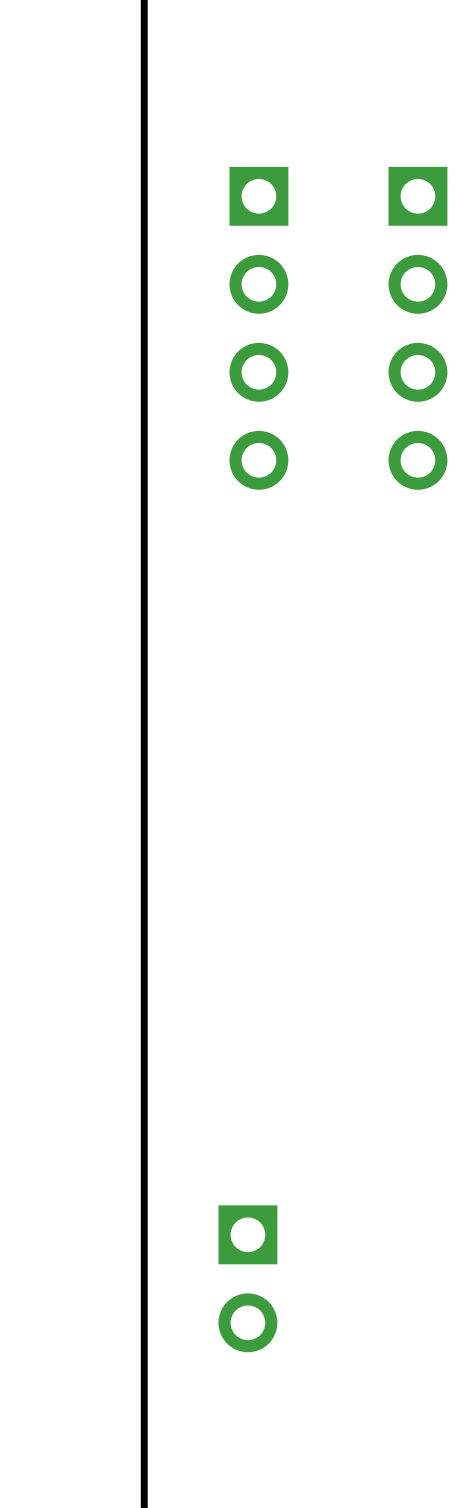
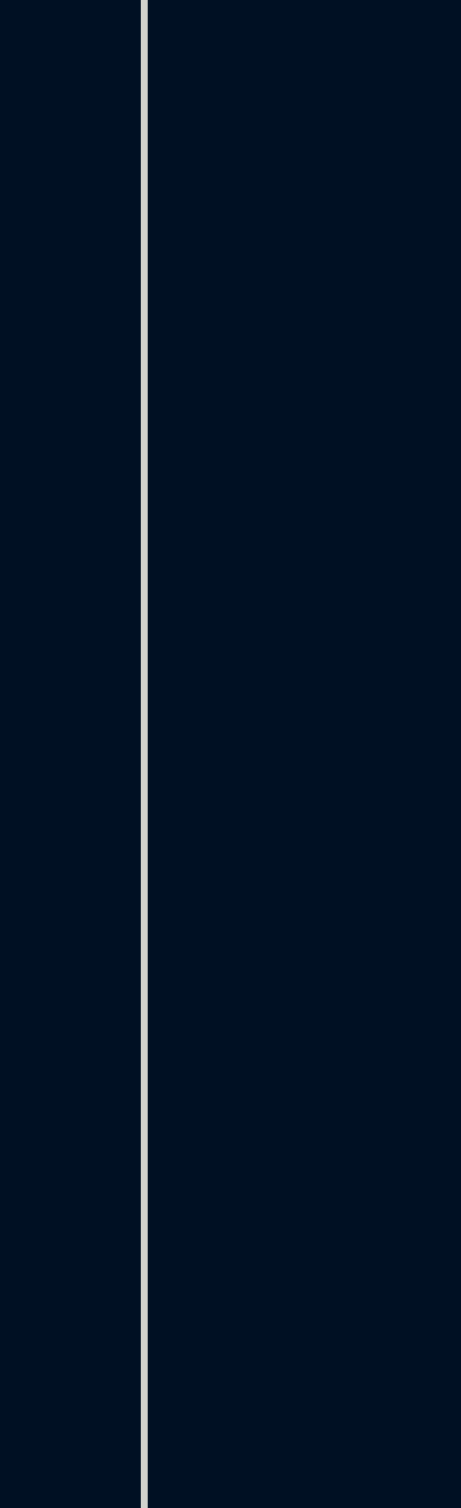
part: (258, 328) -> none
part: (417, 328) -> none
part: (247, 1278) -> none

